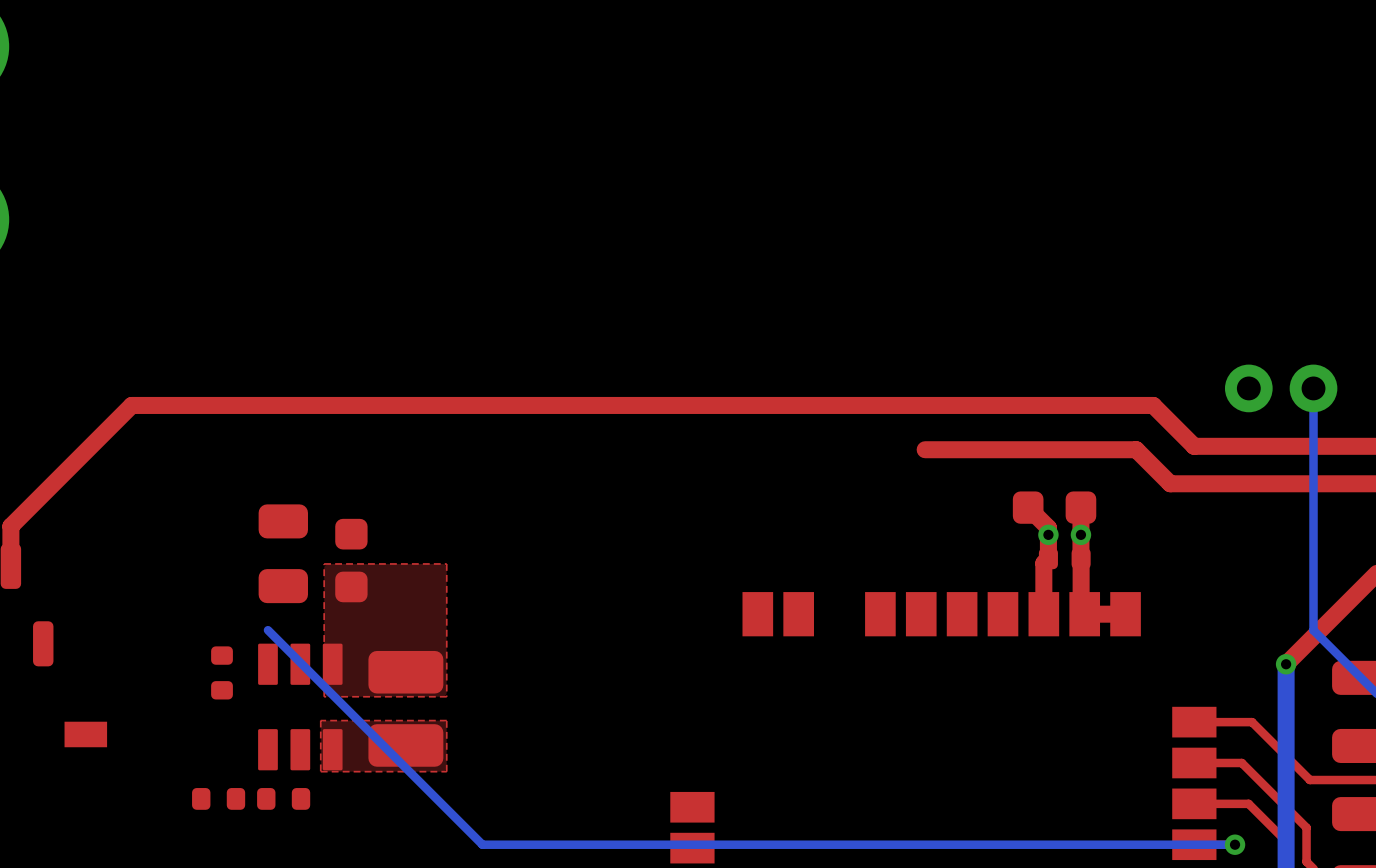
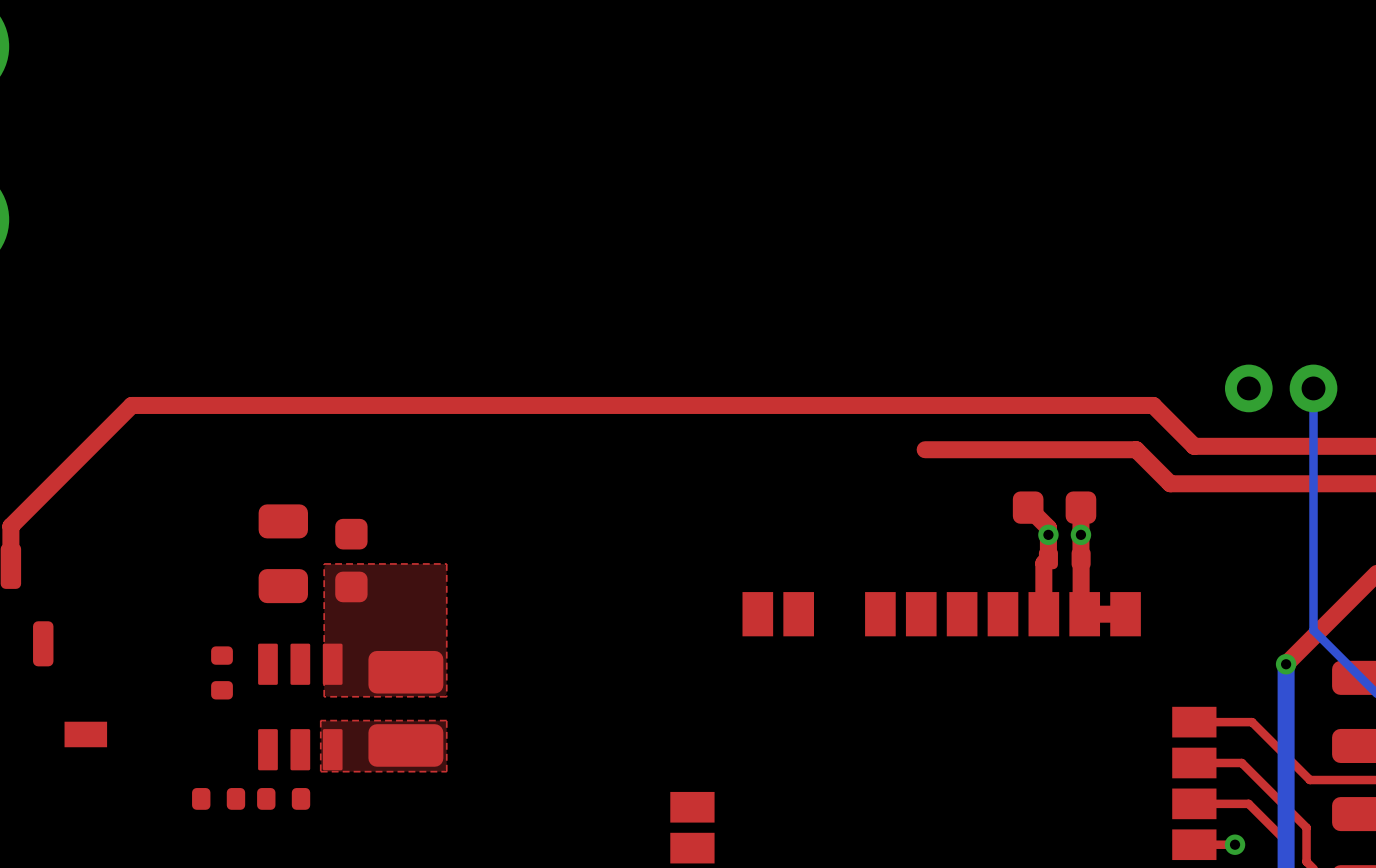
bottom track: (267, 630) (482, 844) (1235, 844) -> none

